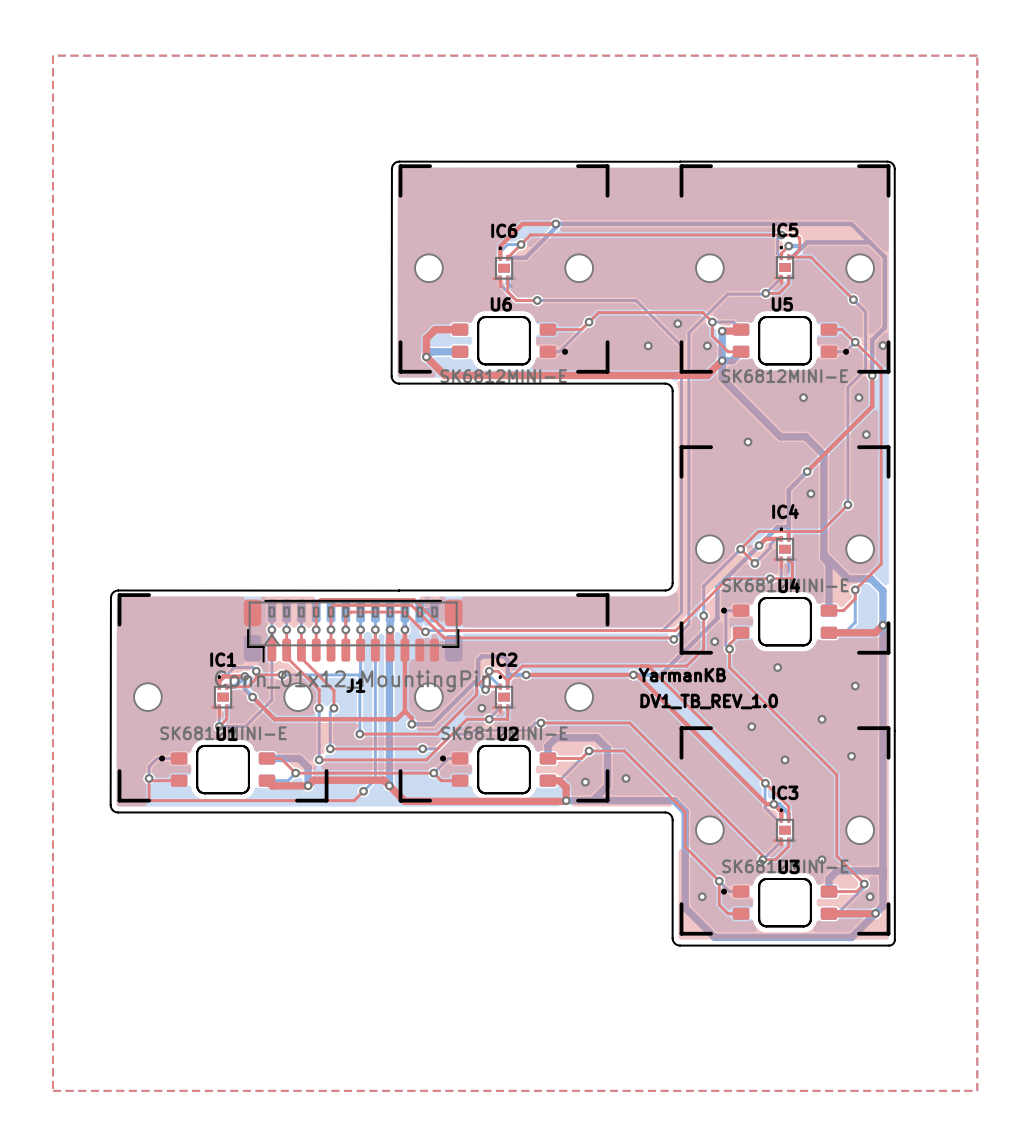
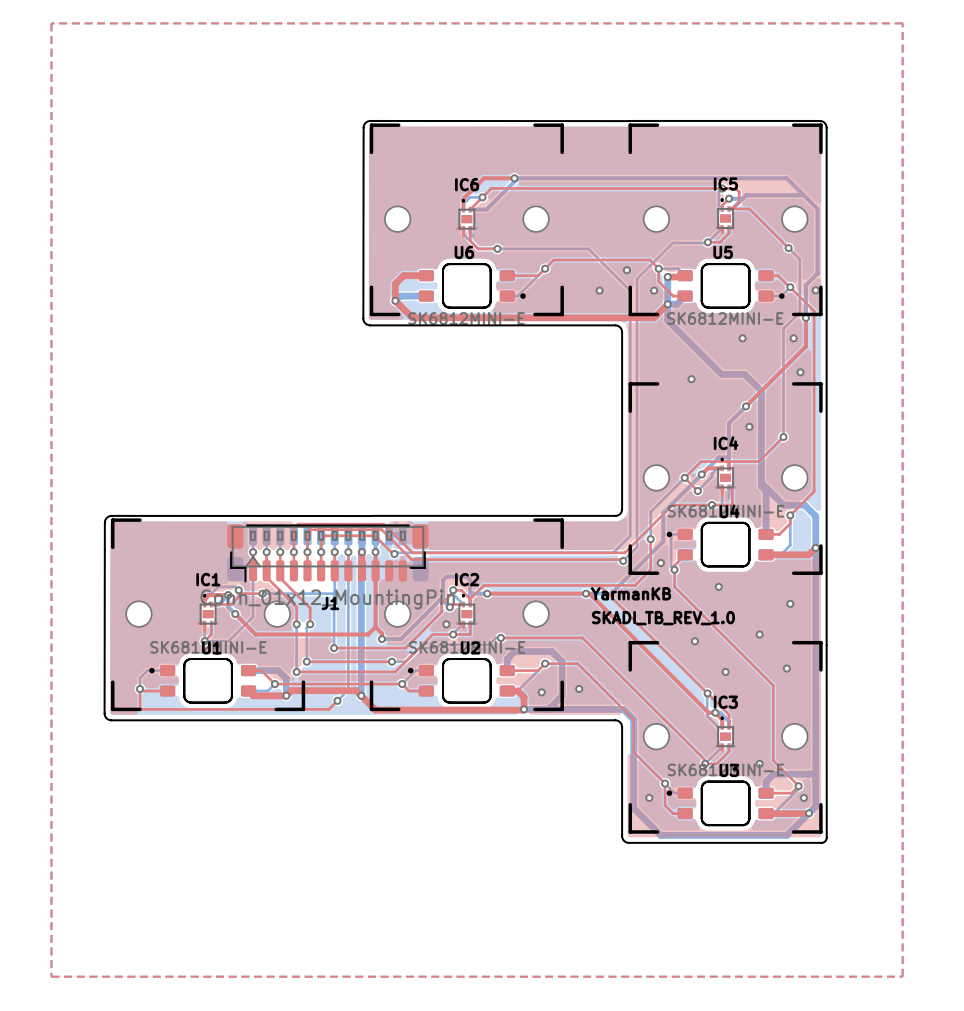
text: DV1_TB_REV_1.0 (709, 701) -> SKADI_TB_REV_1.0 (663, 618)

